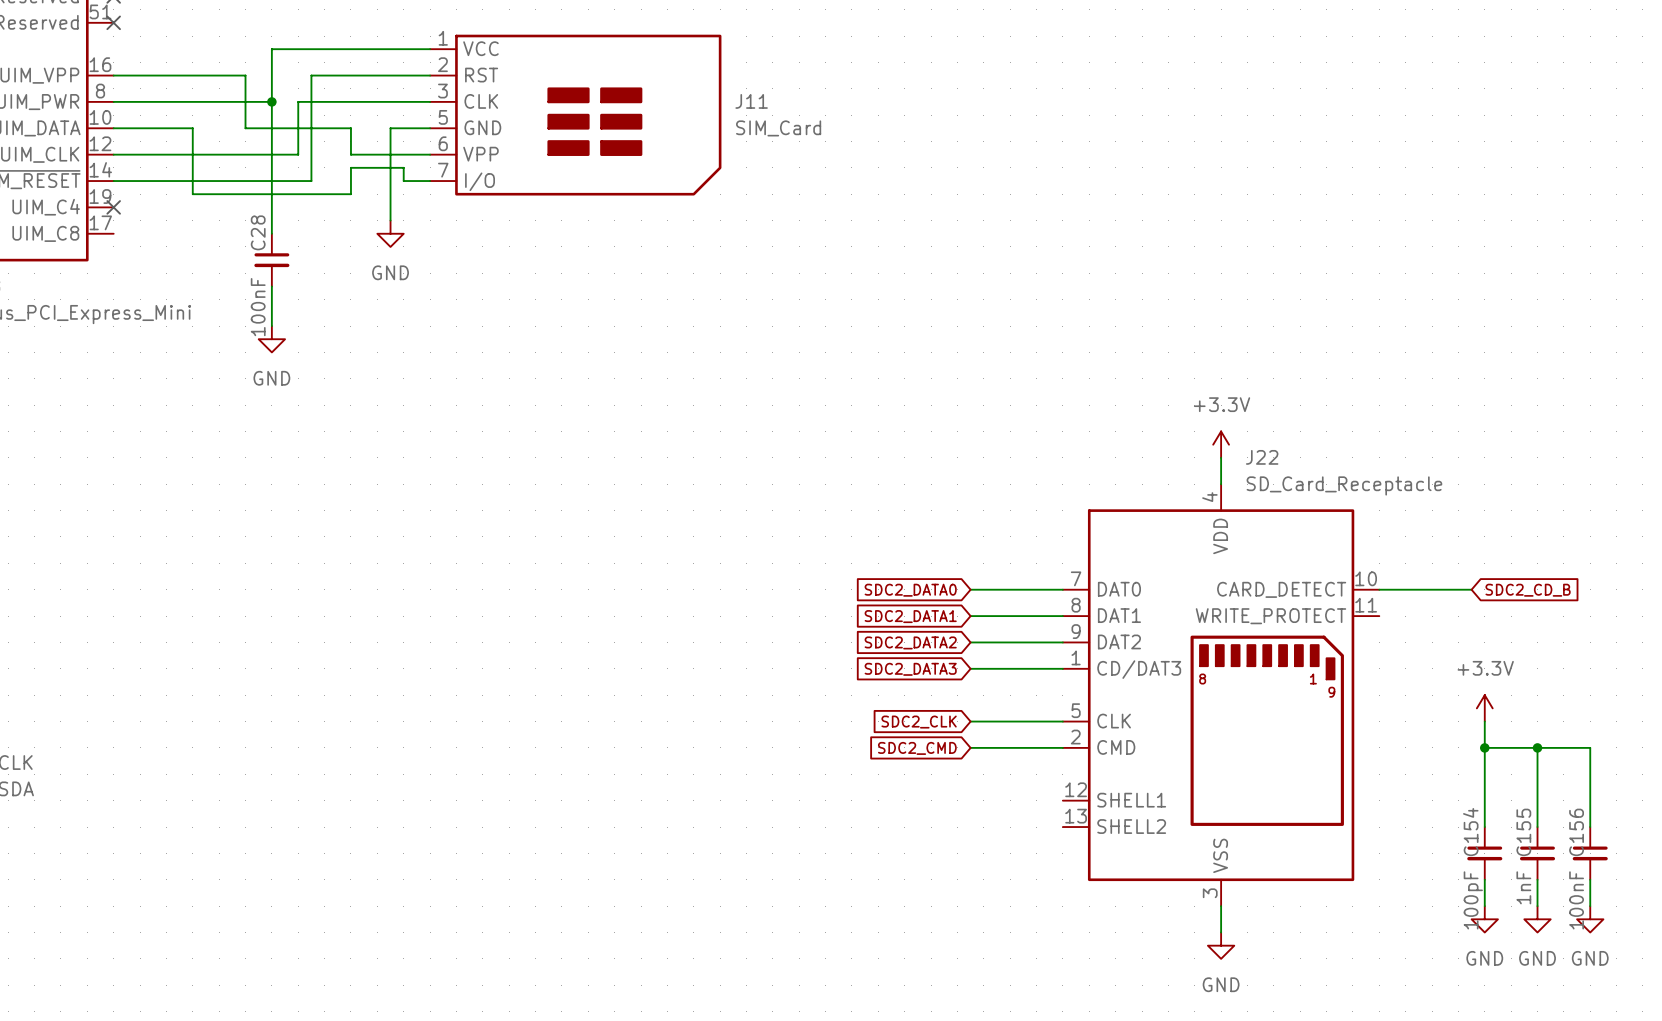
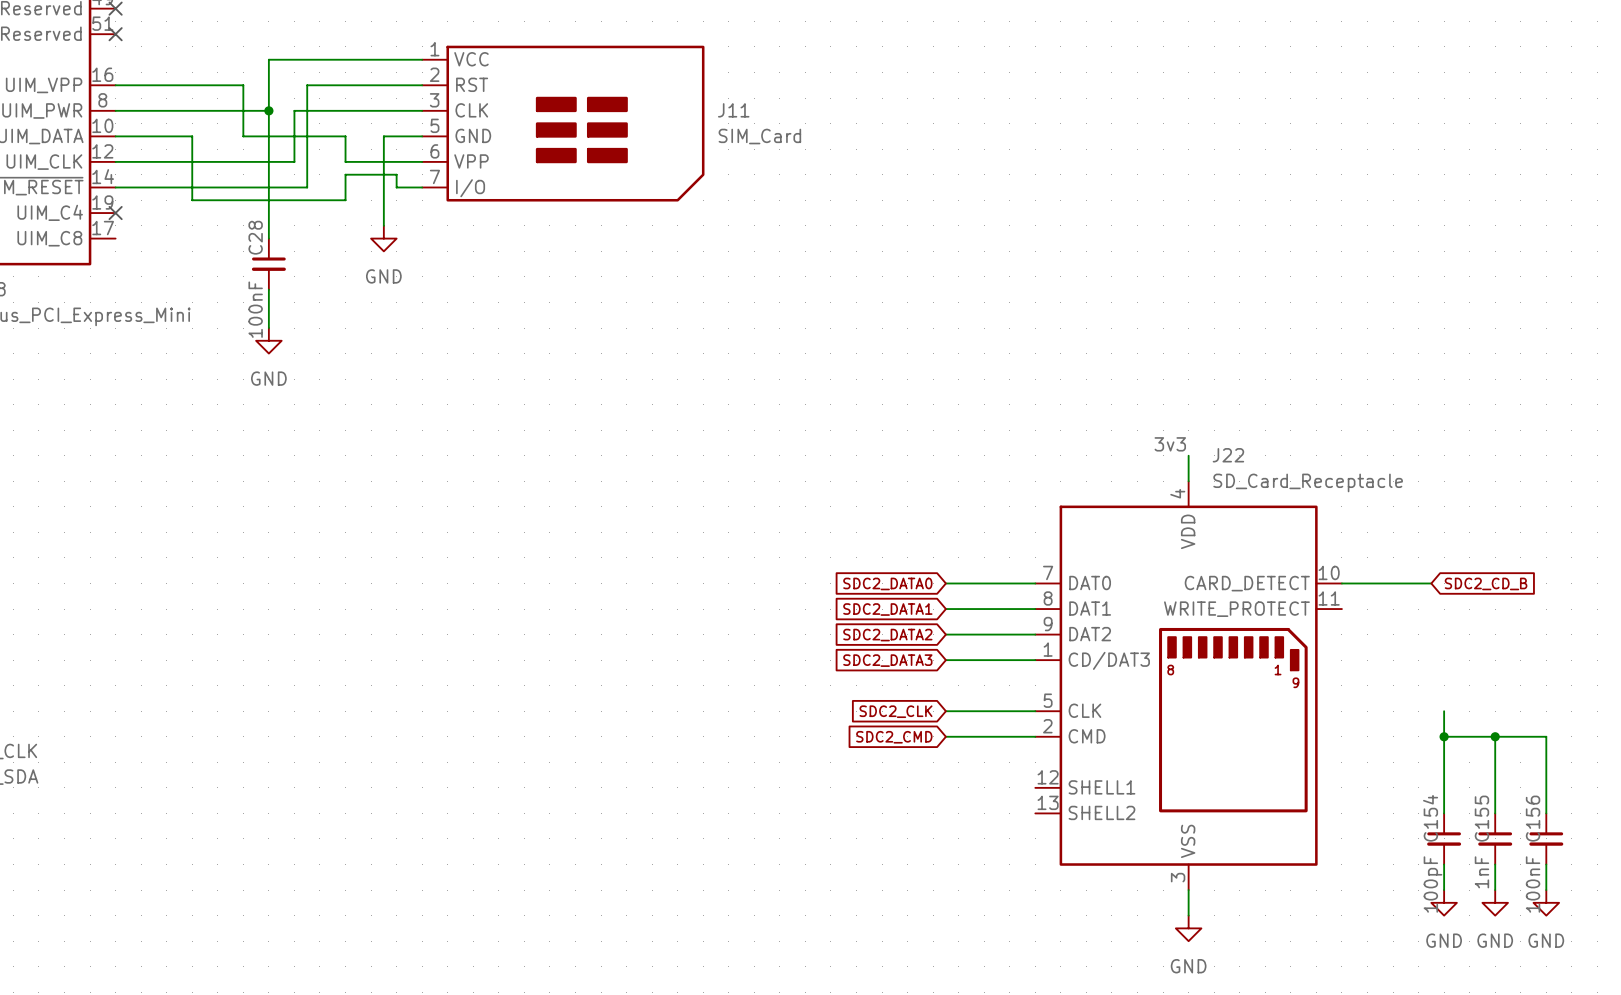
power symbol: +3.3V (1221, 444) -> none
label: none -> 3v3 (1170, 444)
power symbol: +3.3V (1484, 708) -> none

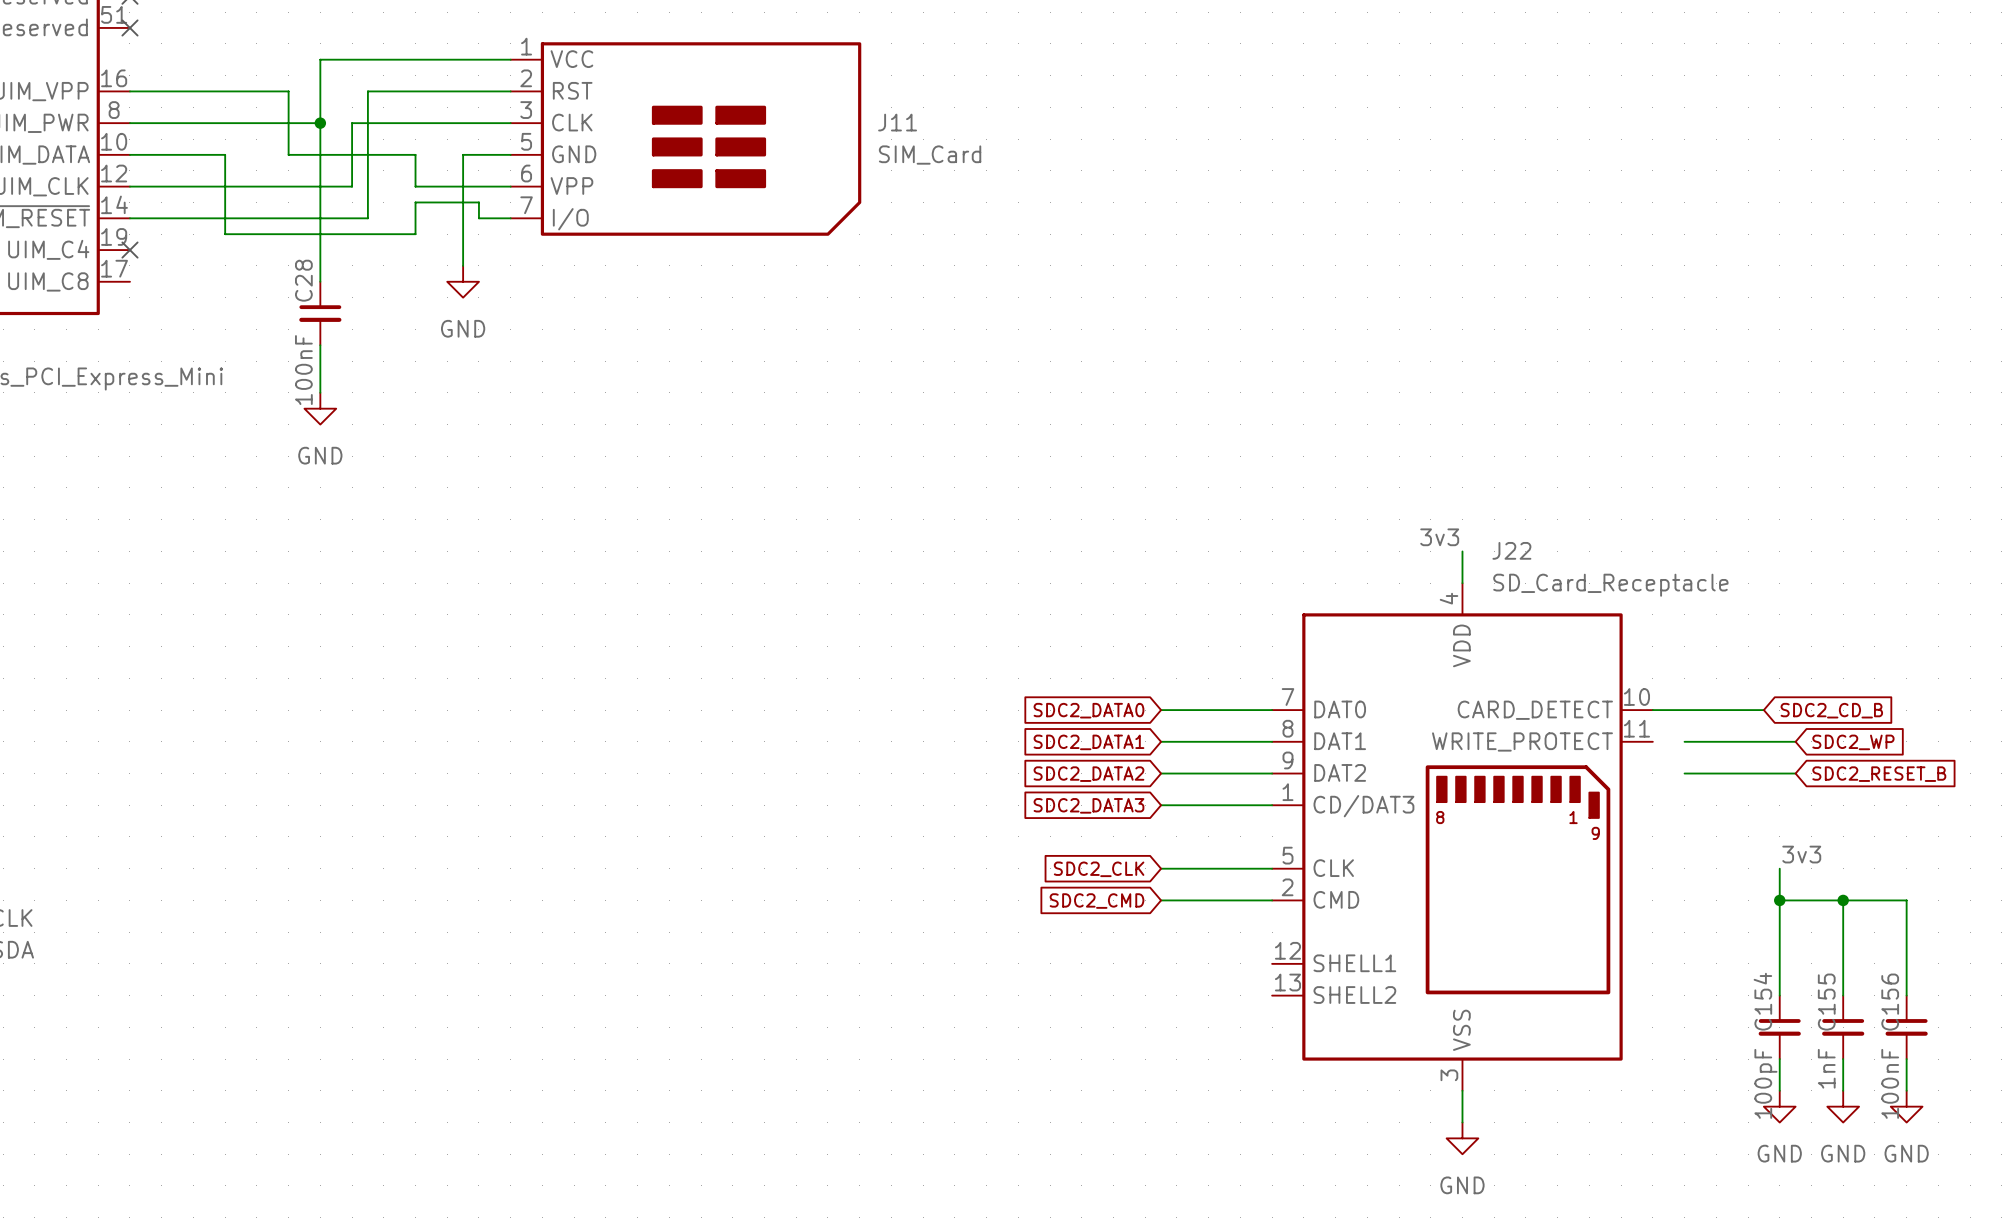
wire: none -> (1684, 741) (1795, 741)
global label: none -> SDC2_WP (1853, 742)
wire: none -> (1684, 773) (1795, 773)
global label: none -> SDC2_RESET_B (1879, 774)
label: none -> 3v3 (1801, 854)

